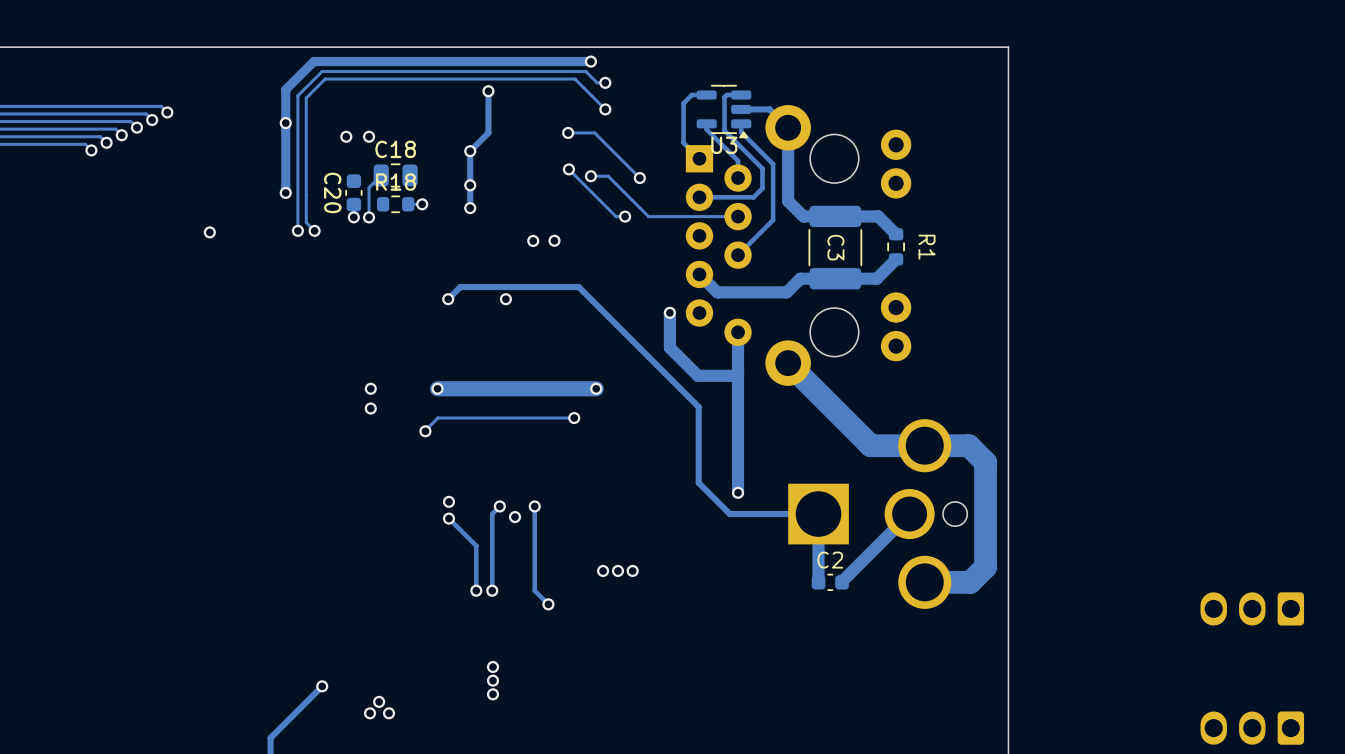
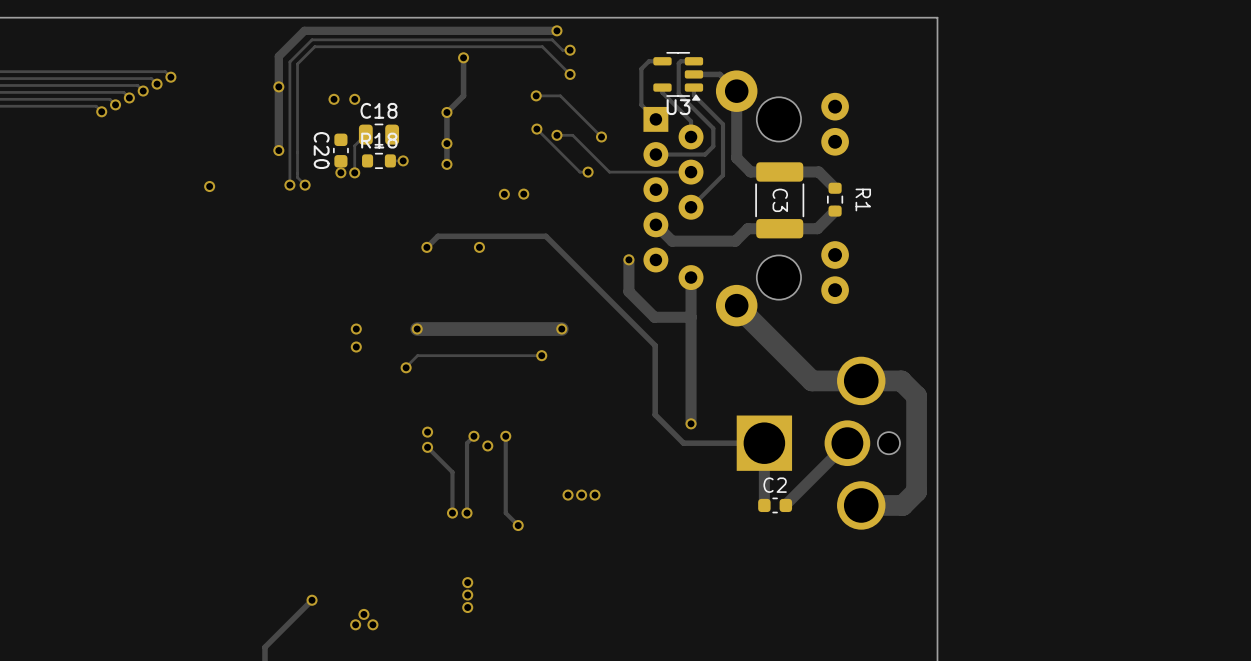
part: (1252, 608) -> none
part: (1252, 728) -> none

